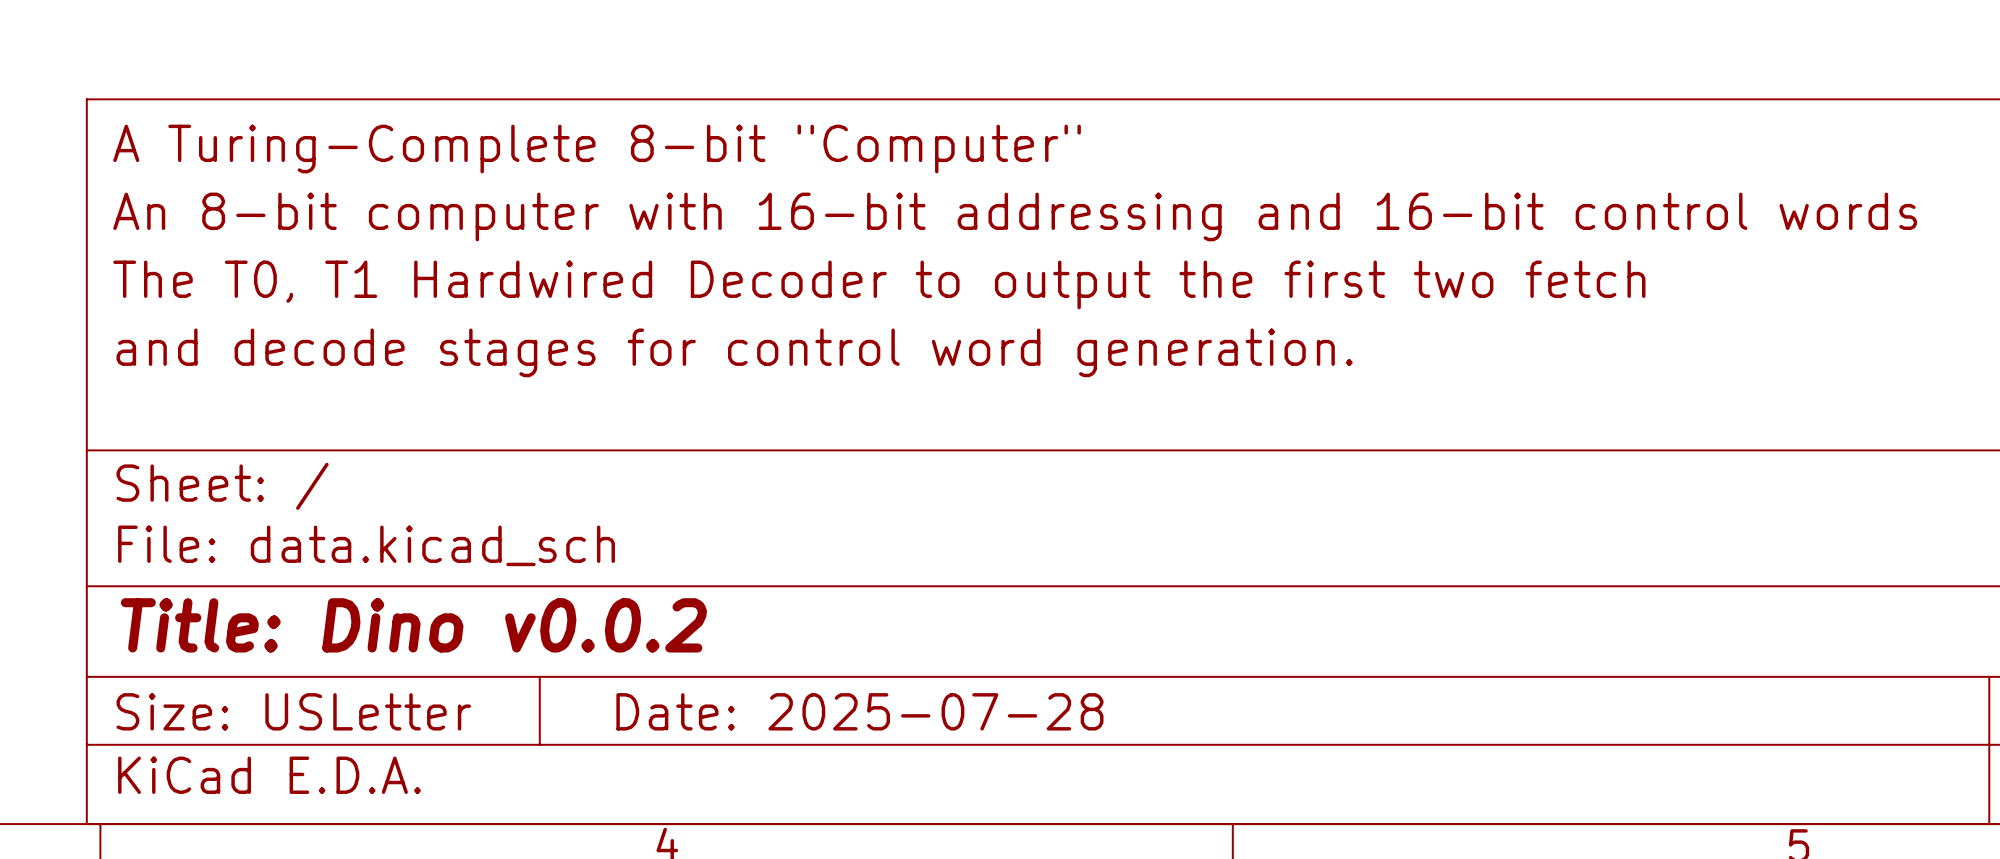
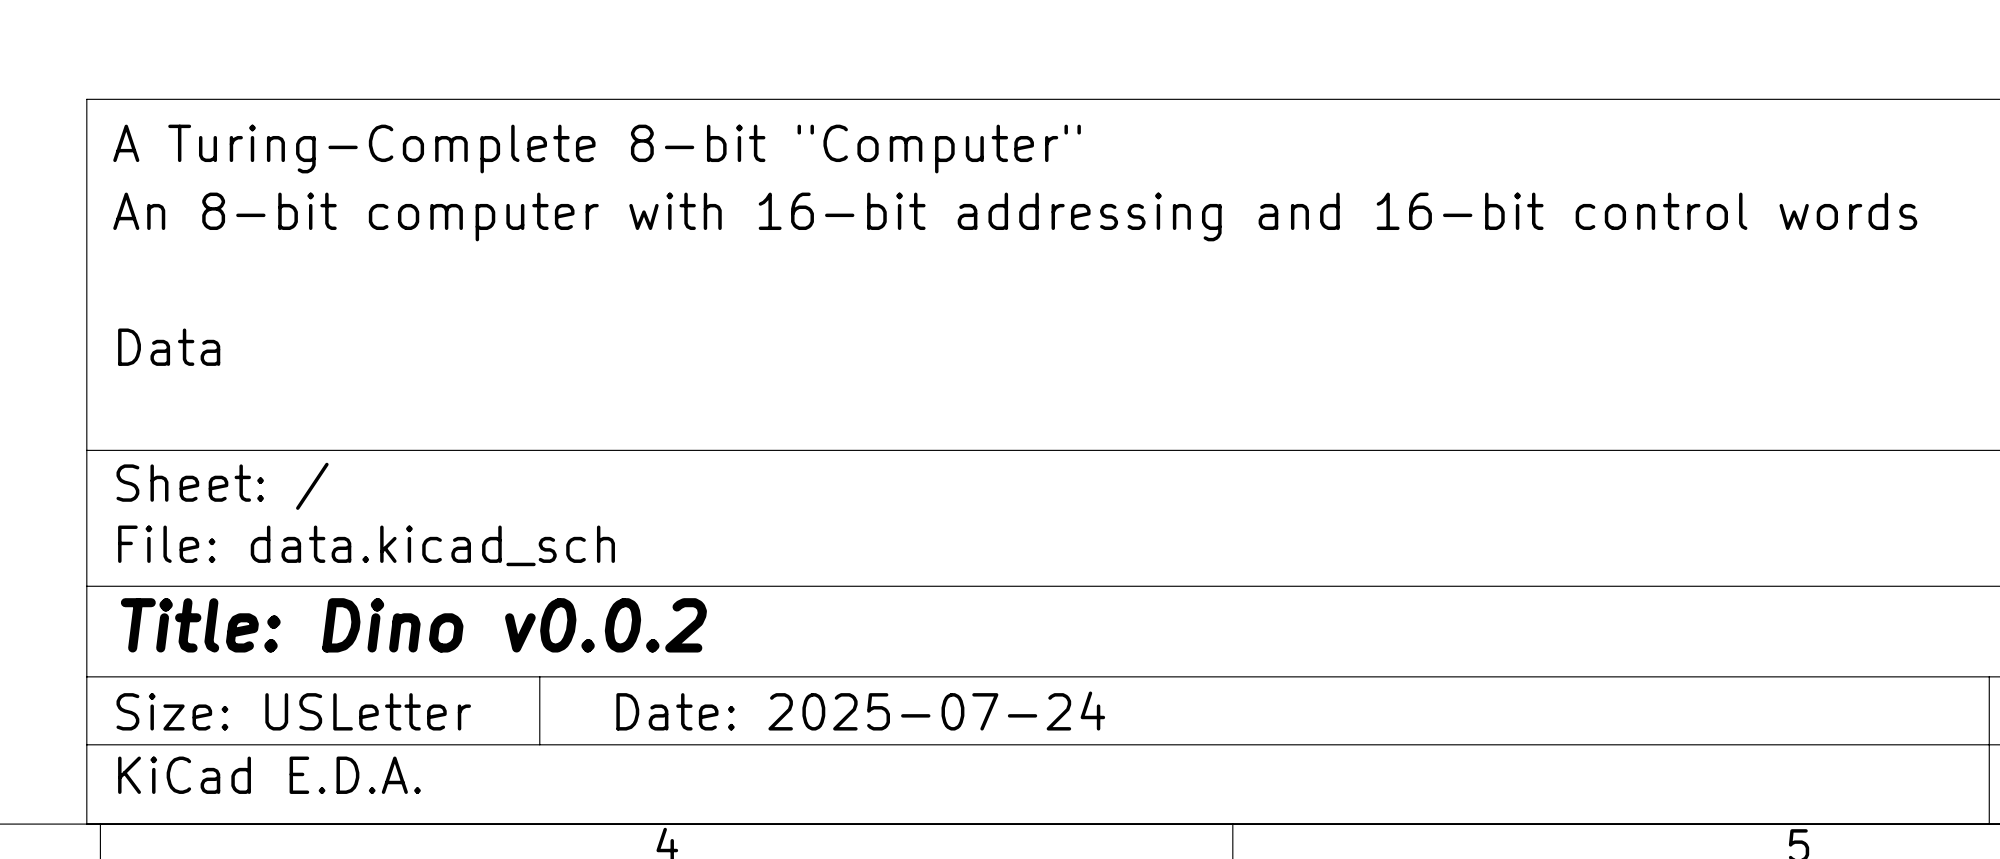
title block: The T0, T1 Hardwired Decoder to output the first two fetch (879, 284) -> none
title block: and decode stages for control word generation. (734, 352) -> Data (169, 347)
title block: Date: 2025-07-28 (859, 711) -> Date: 2025-07-24 (860, 711)

